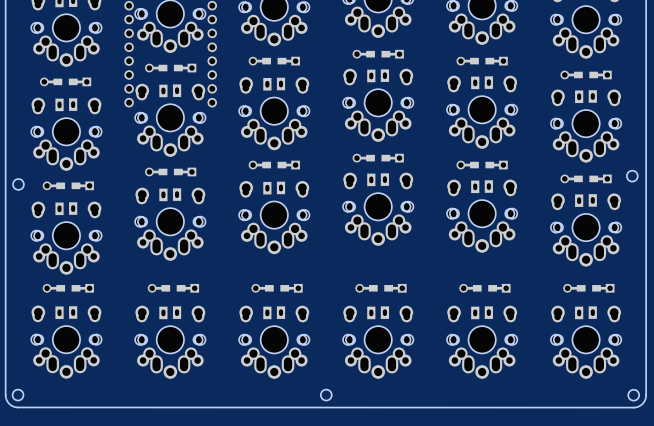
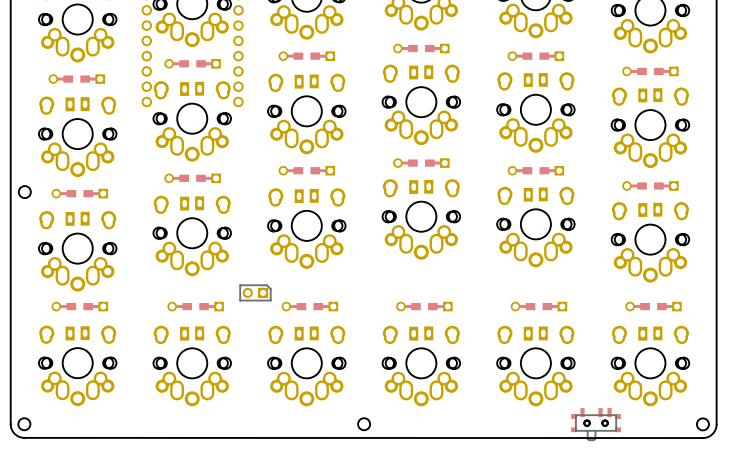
round board edge: [626, 170, 638, 182] -> none
part: none -> (255, 292)
part: none -> (596, 423)
part: none -> (596, 424)

